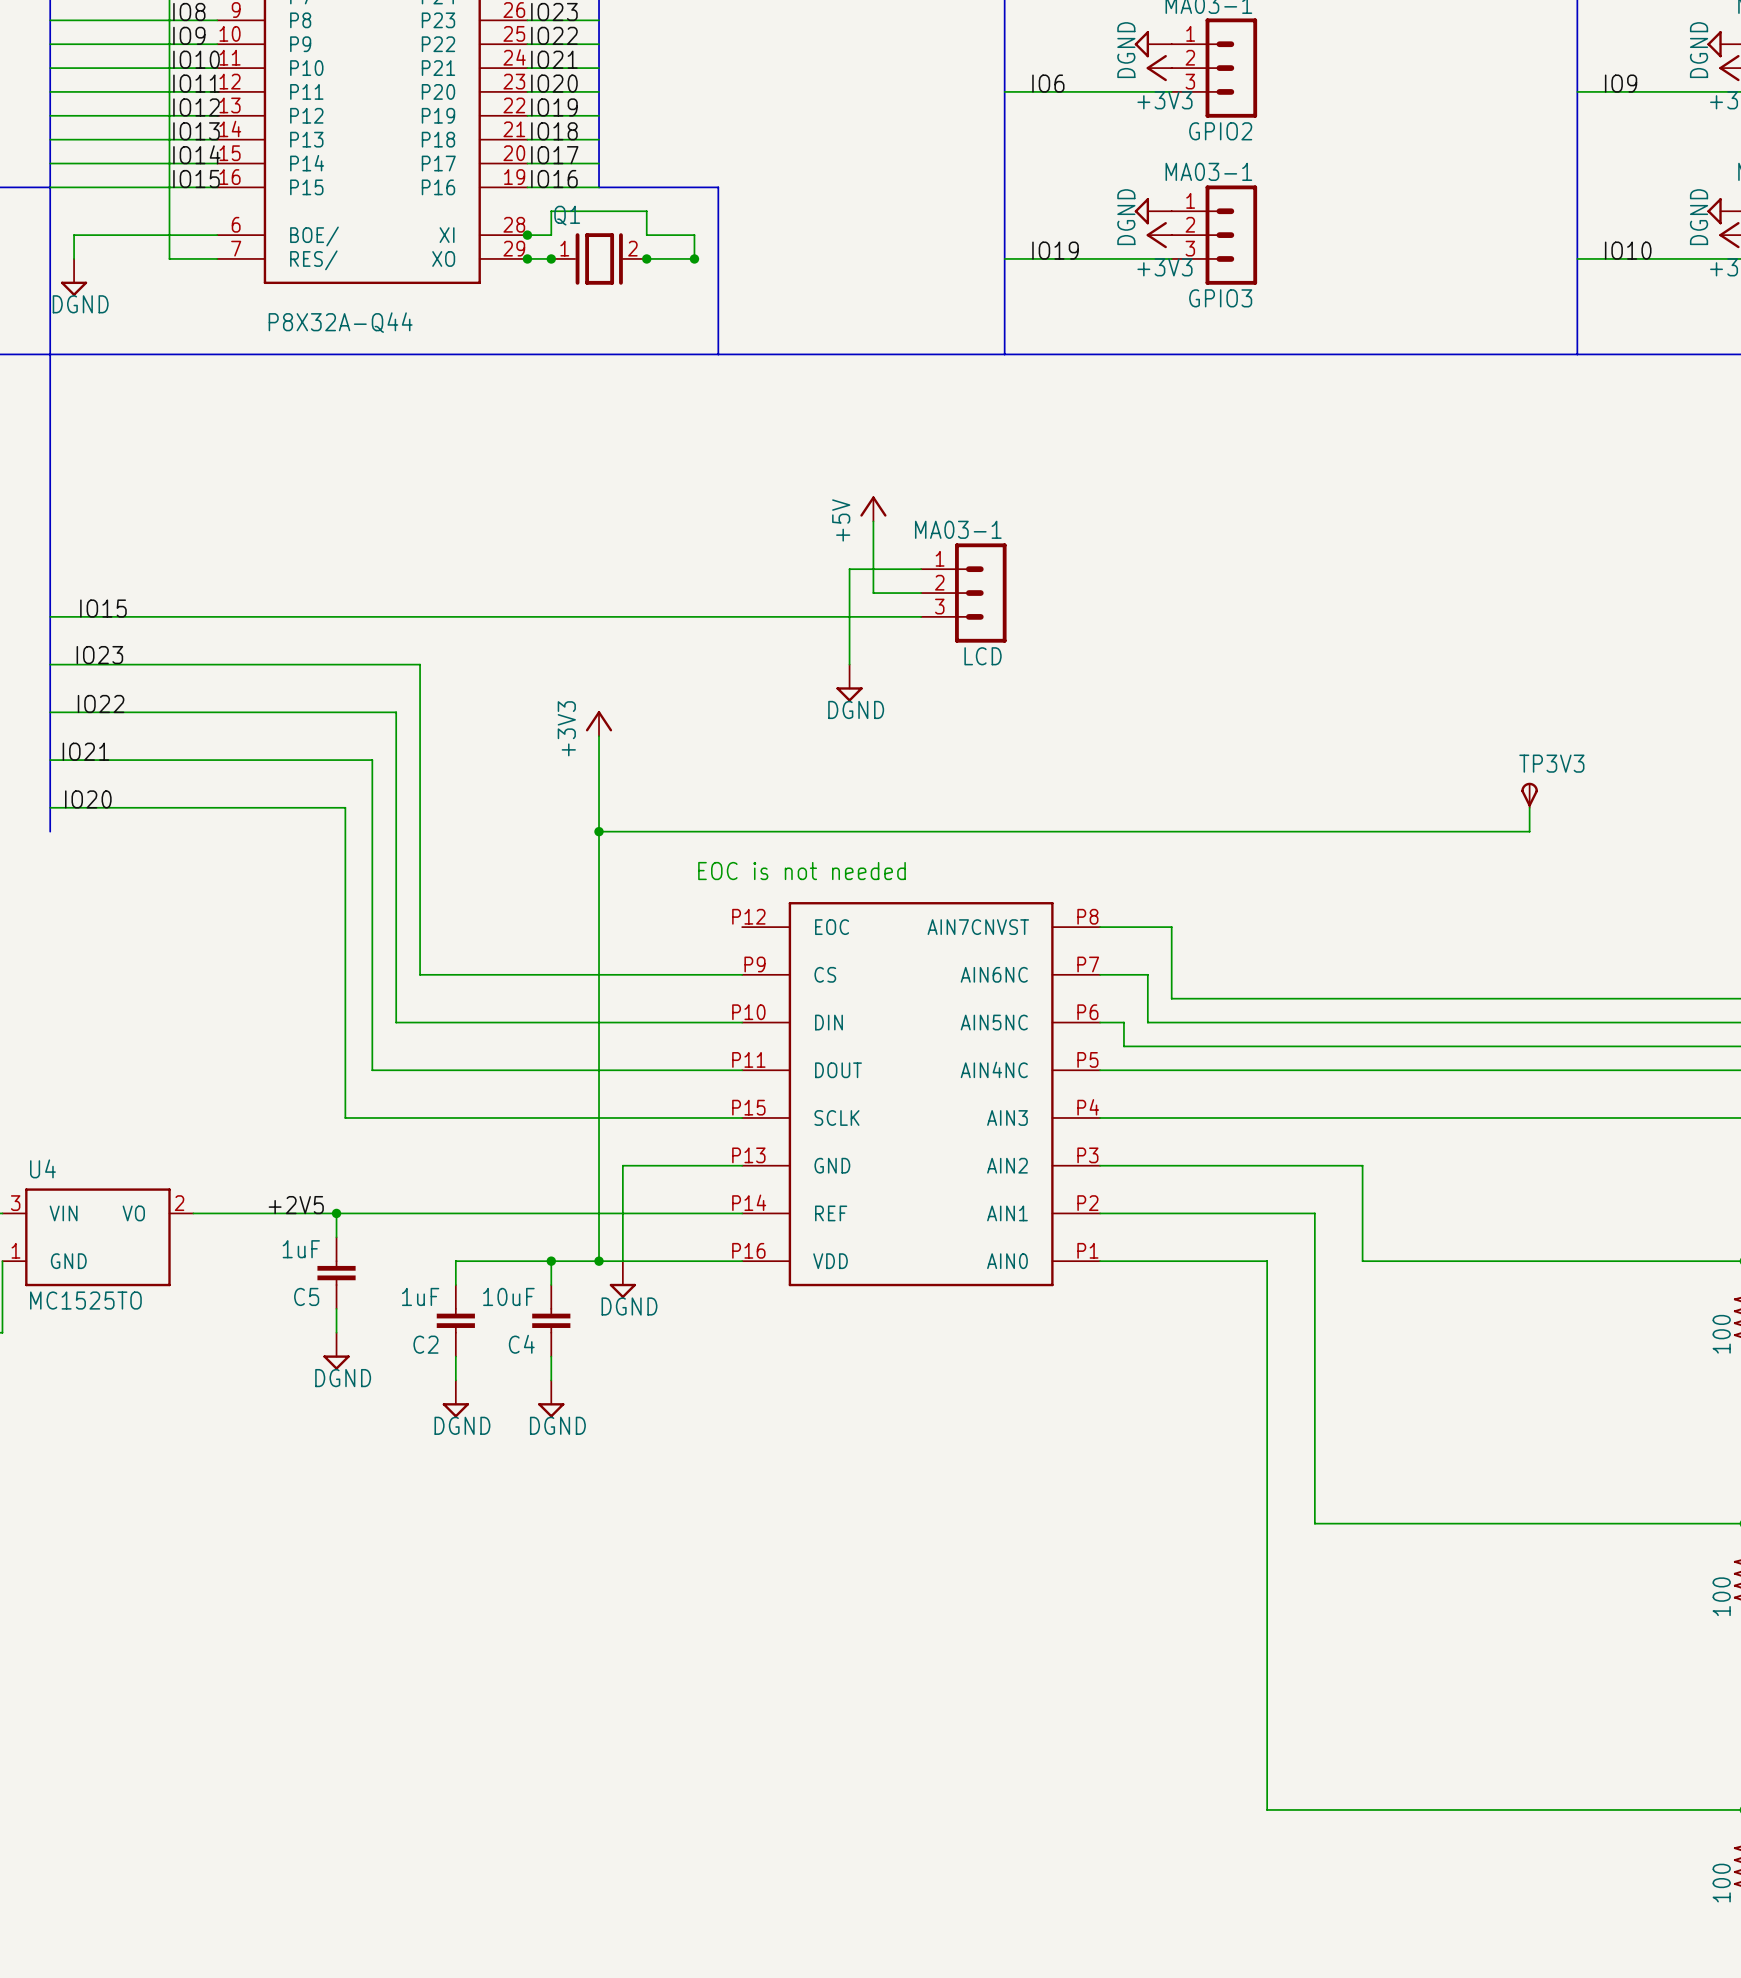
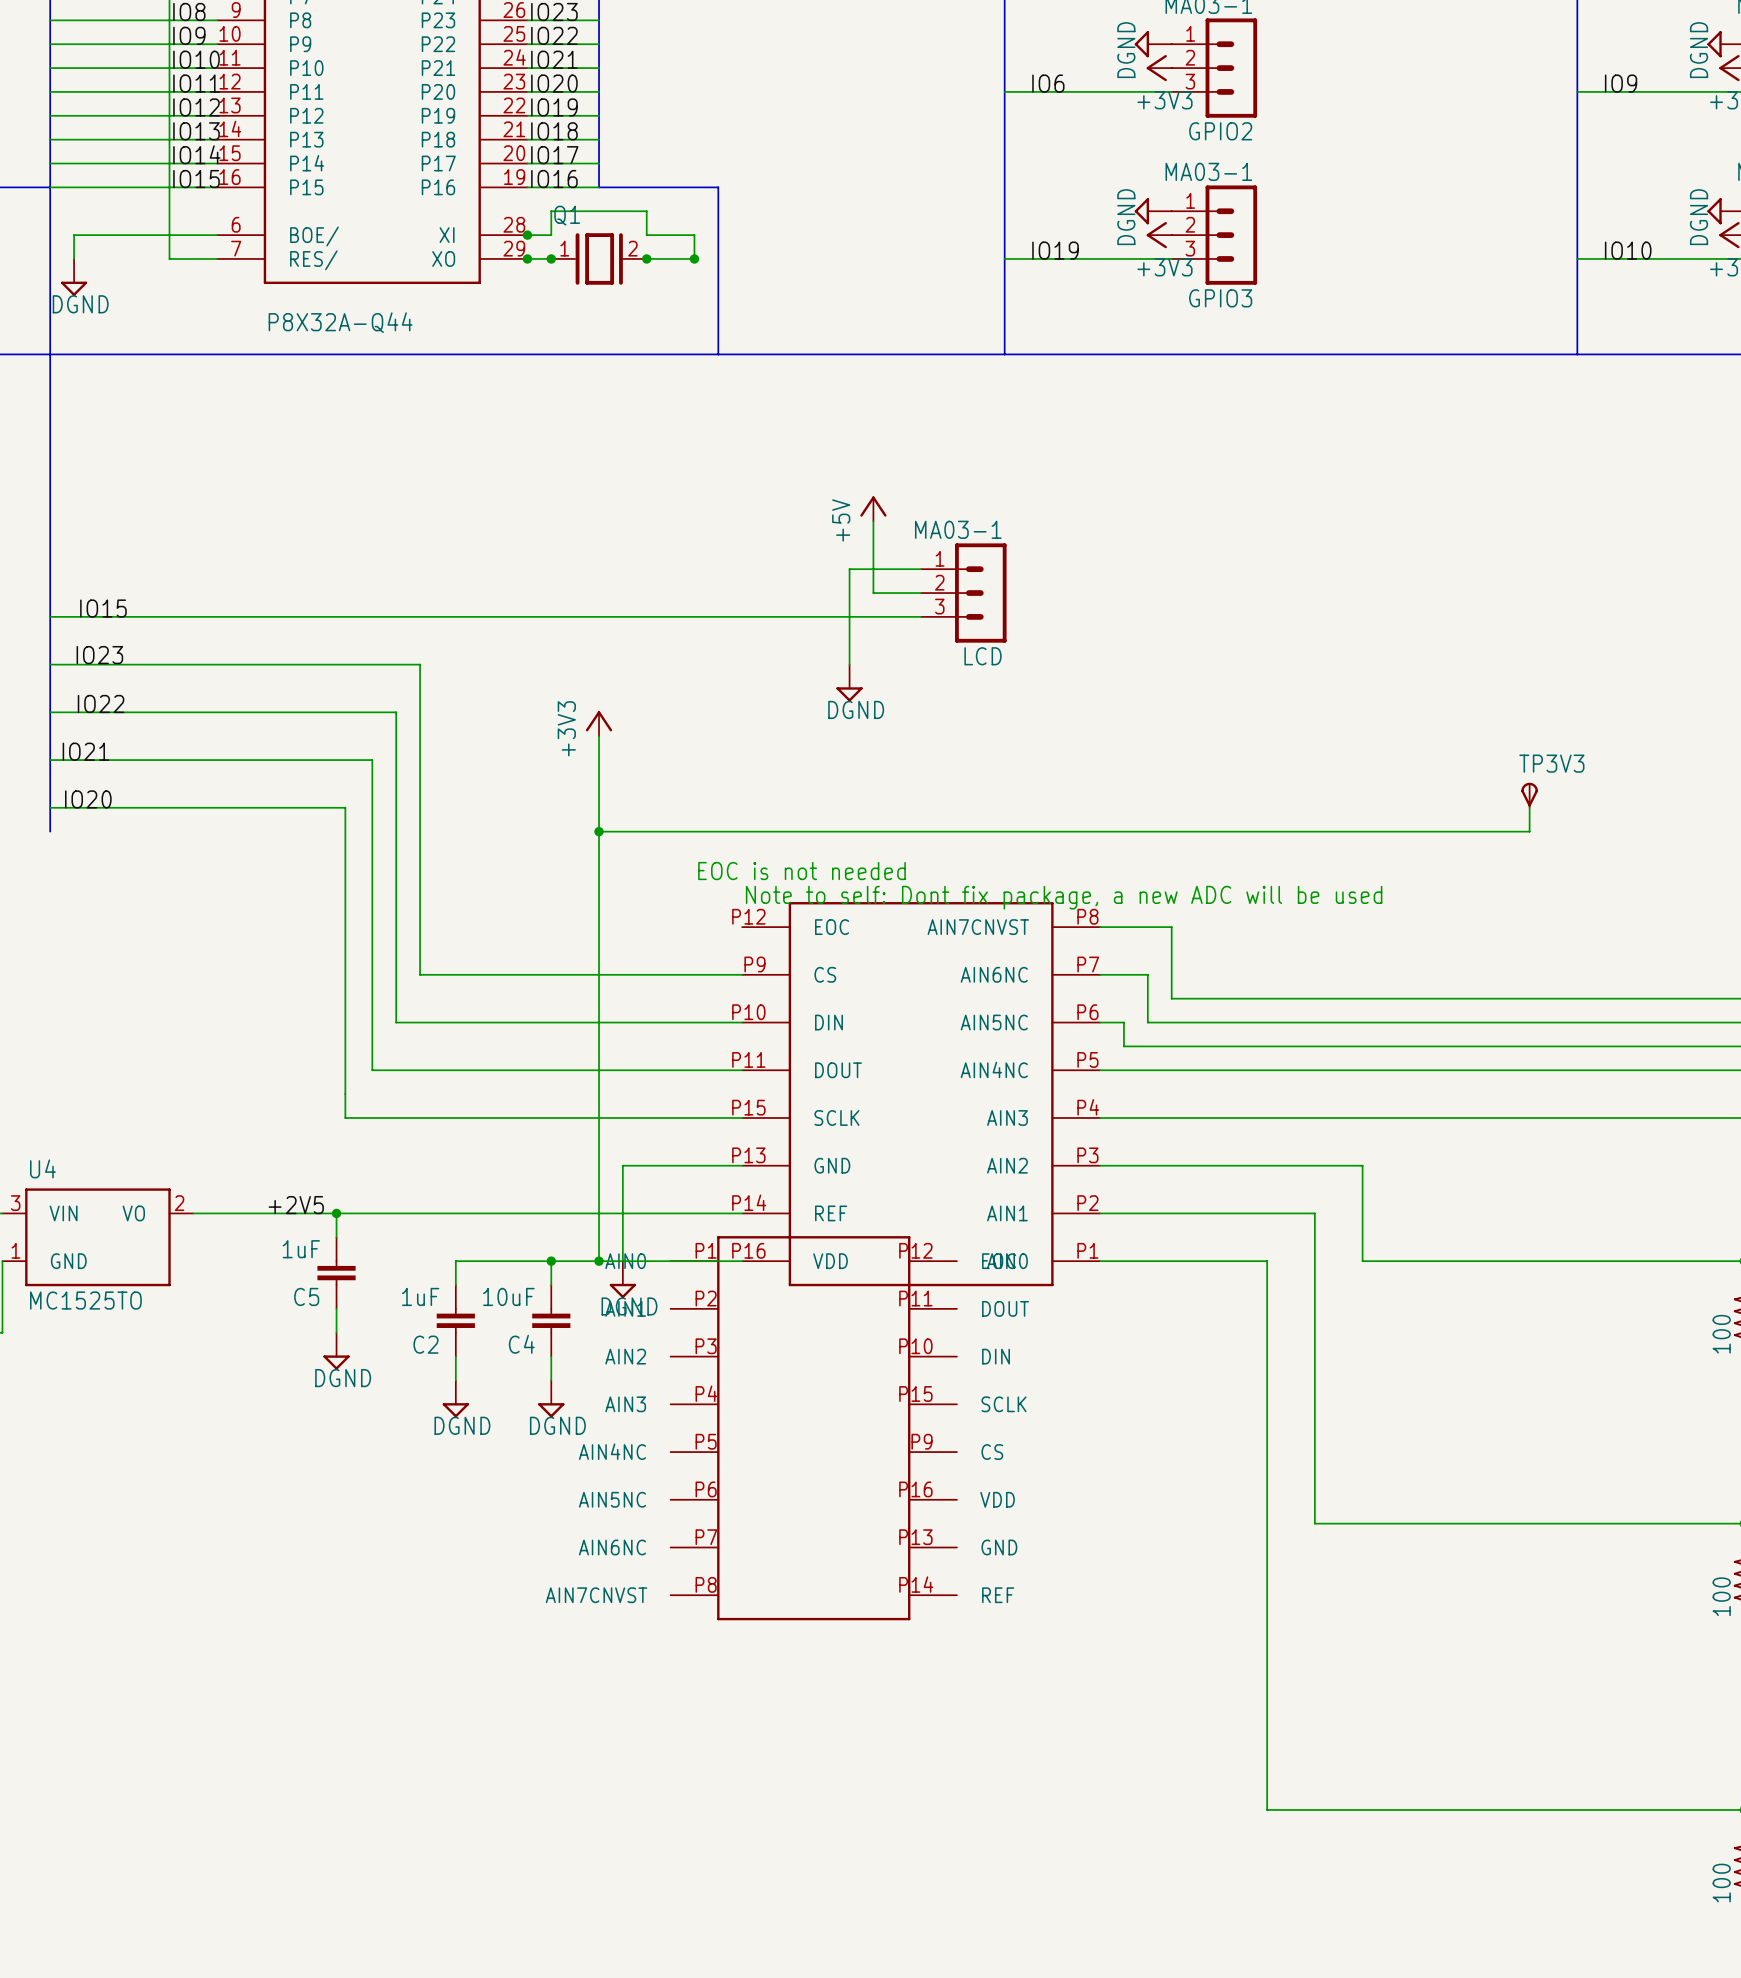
text: none -> Note to self: Dont fix package, a new ADC will be used (1064, 897)
part: none -> (813, 1428)

